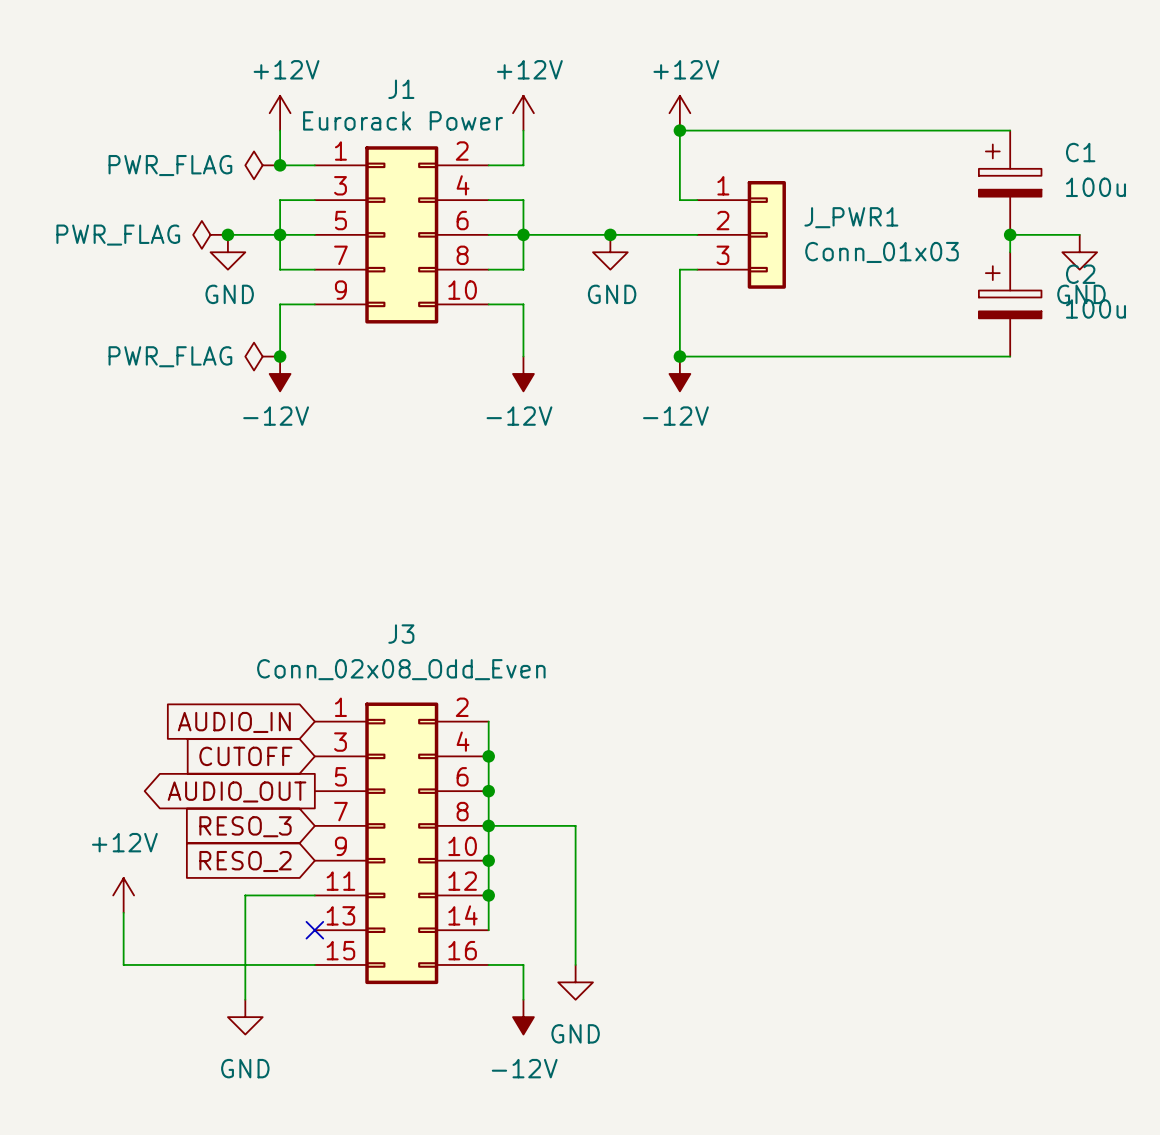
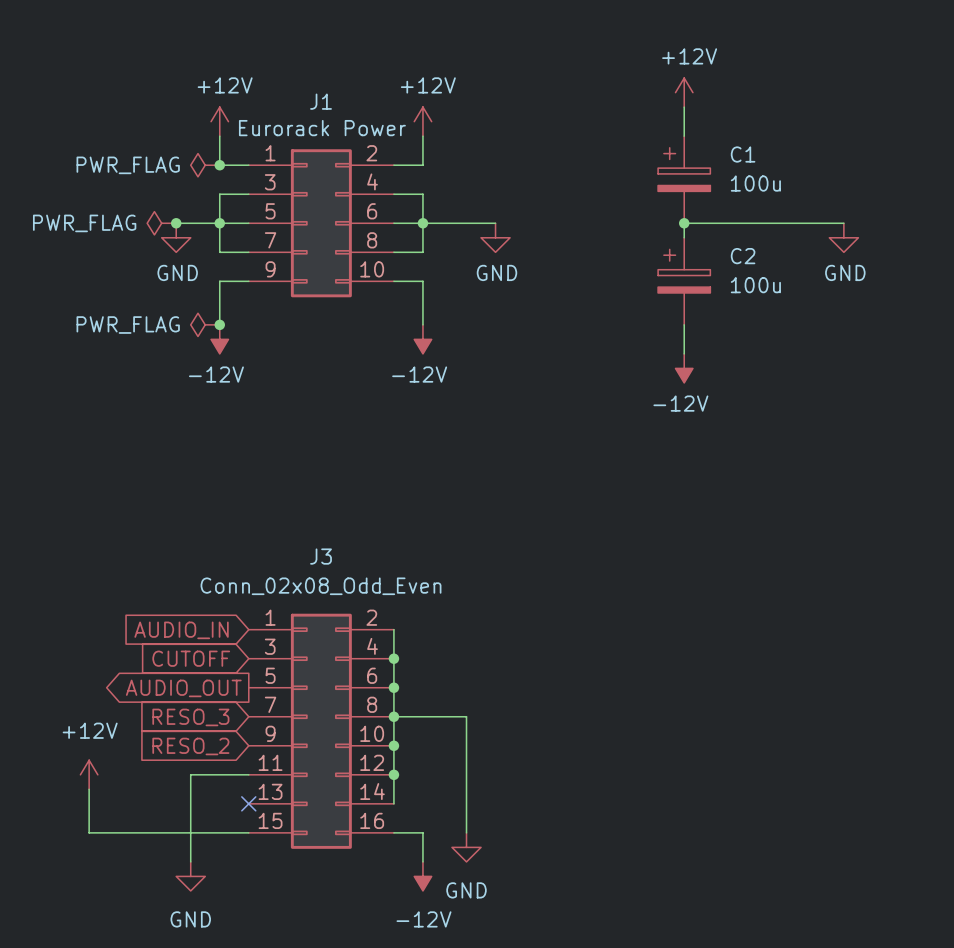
wire: none -> (684, 107) (684, 136)
power symbol position: +12V (679, 113) -> +12V (684, 92)
junction: (679, 130) -> none
wire: (1010, 130) (679, 130) (679, 200) (697, 200) -> none
C1 position: (1010, 182) -> (684, 179)
wire: (610, 234) (697, 234) -> none
junction: (610, 234) -> none
J_PWR1: Conn_01x03 (741, 234) -> none
junction: none -> (684, 223)
wire: (1010, 234) (1010, 252) -> (829, 223) (684, 223) (684, 237)
junction: (1010, 234) -> none
wire: (1027, 234) (1079, 234) -> none
power symbol position: GND (1079, 252) -> GND (843, 237)
wire: (697, 269) (679, 269) (679, 356) (1010, 356) -> none
C2 position: (1010, 304) -> (684, 281)
junction: (679, 356) -> none
wire: none -> (684, 324) (684, 353)
power symbol position: -12V (679, 373) -> -12V (684, 368)

